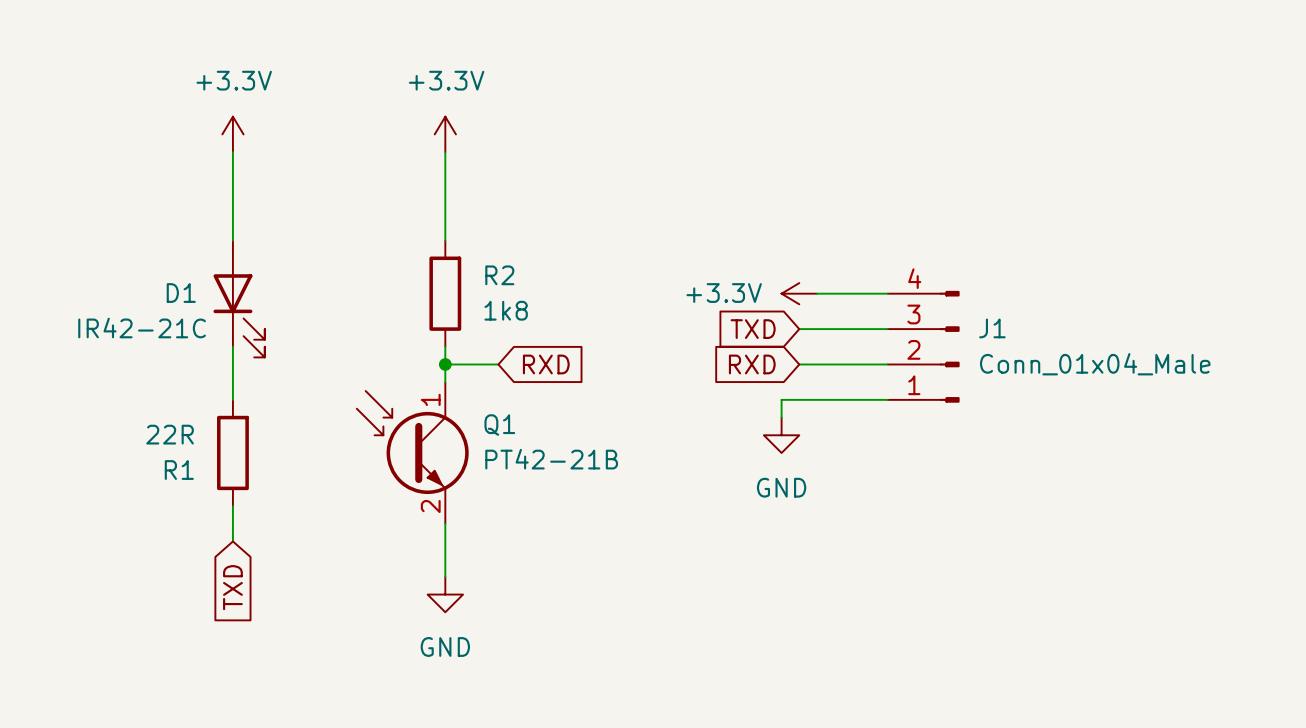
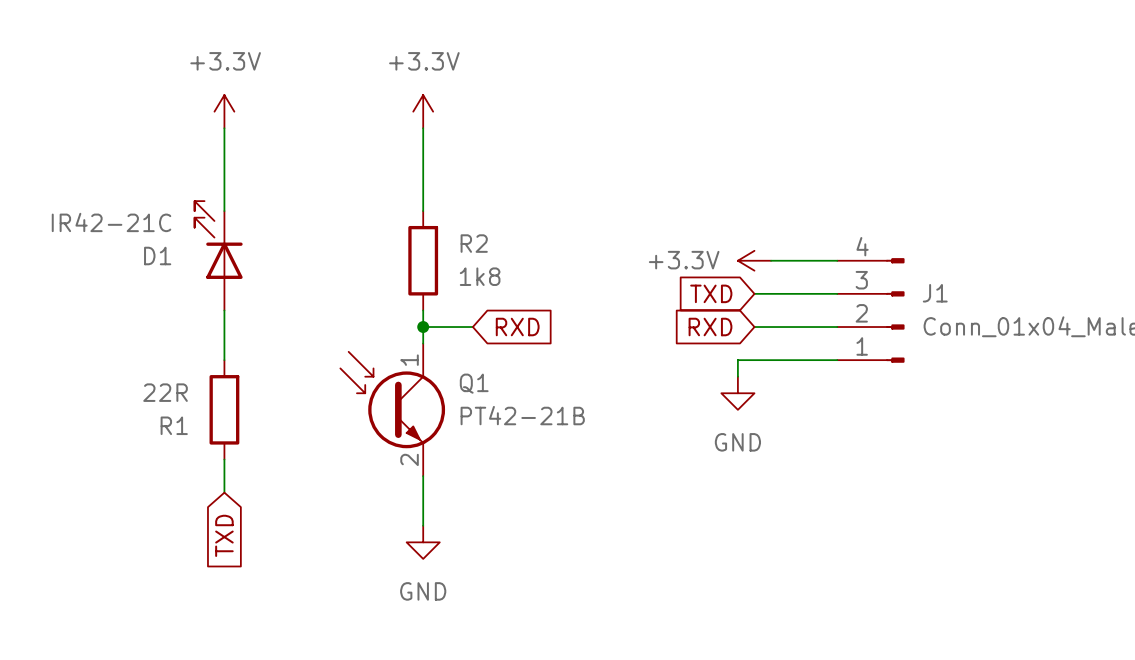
D1 rotation: 0° (239, 315) -> 180° (218, 240)
D1 value position: IR42-21C (142, 328) -> IR42-21C (111, 222)

